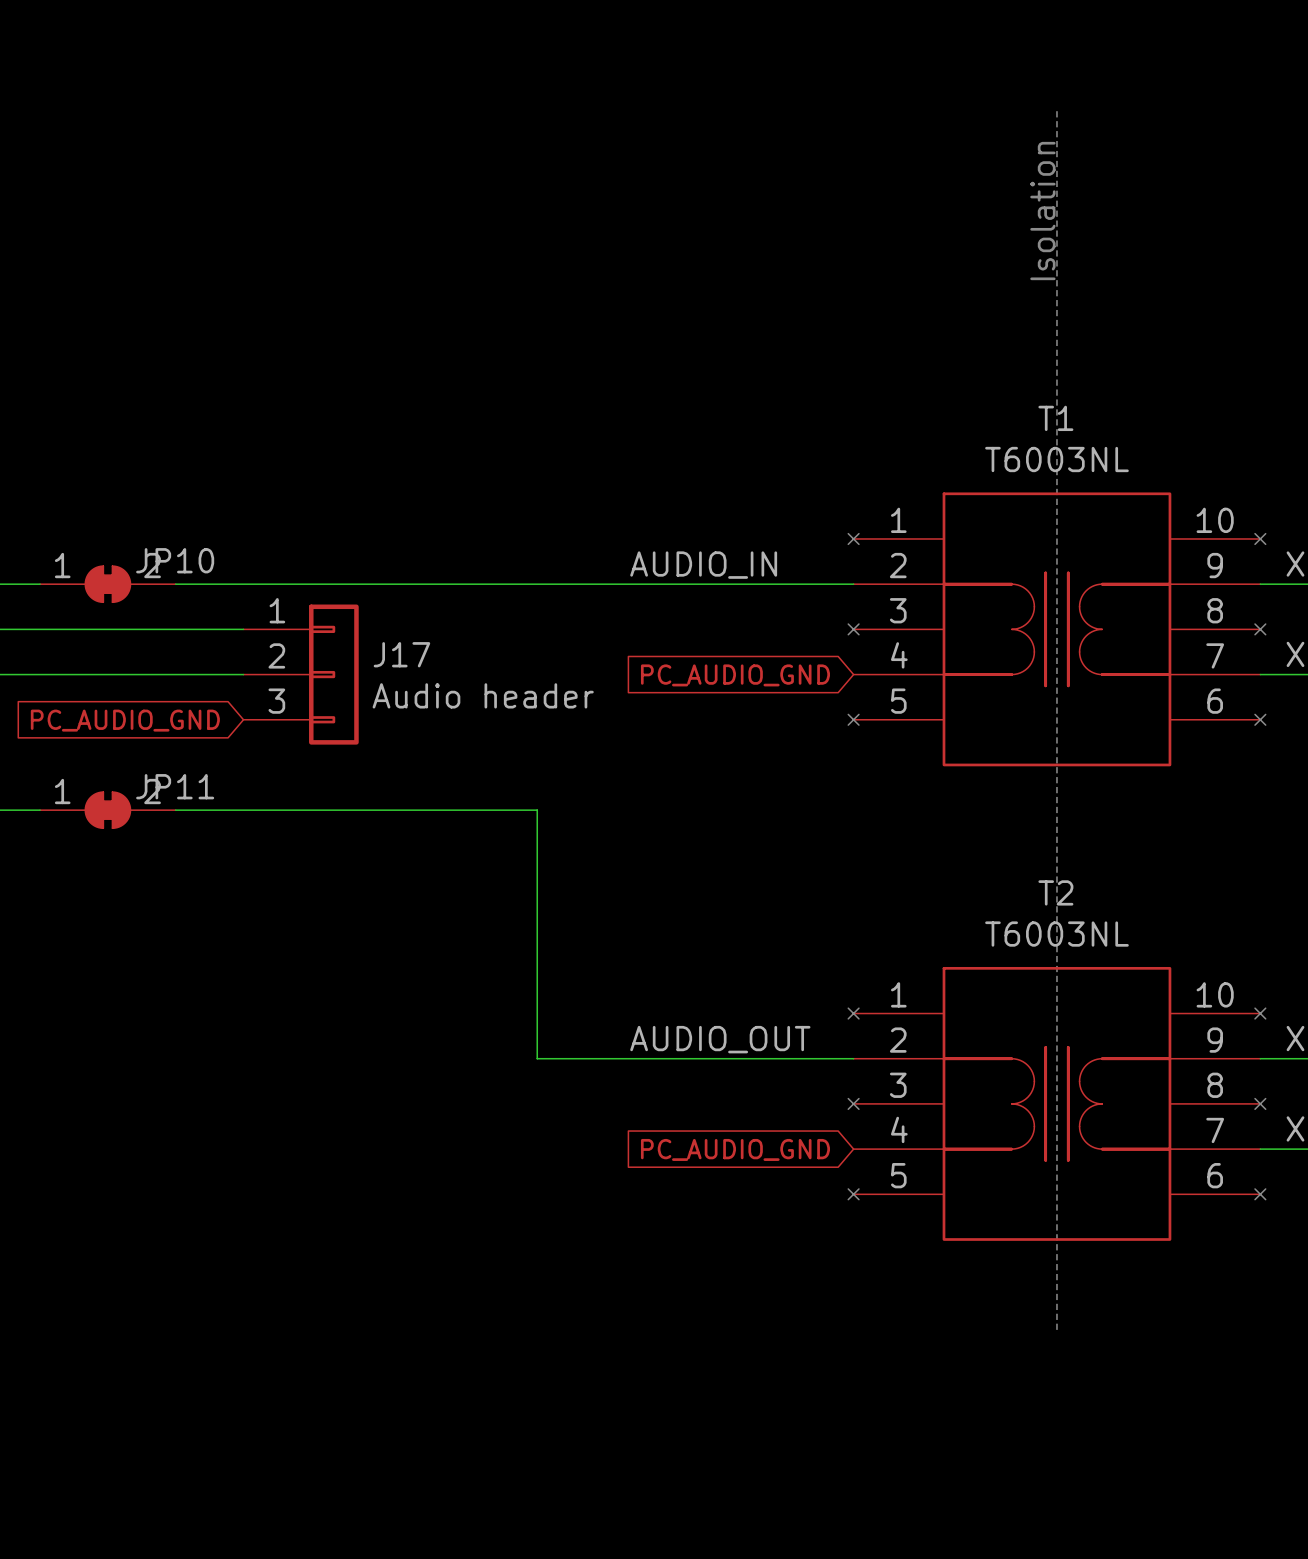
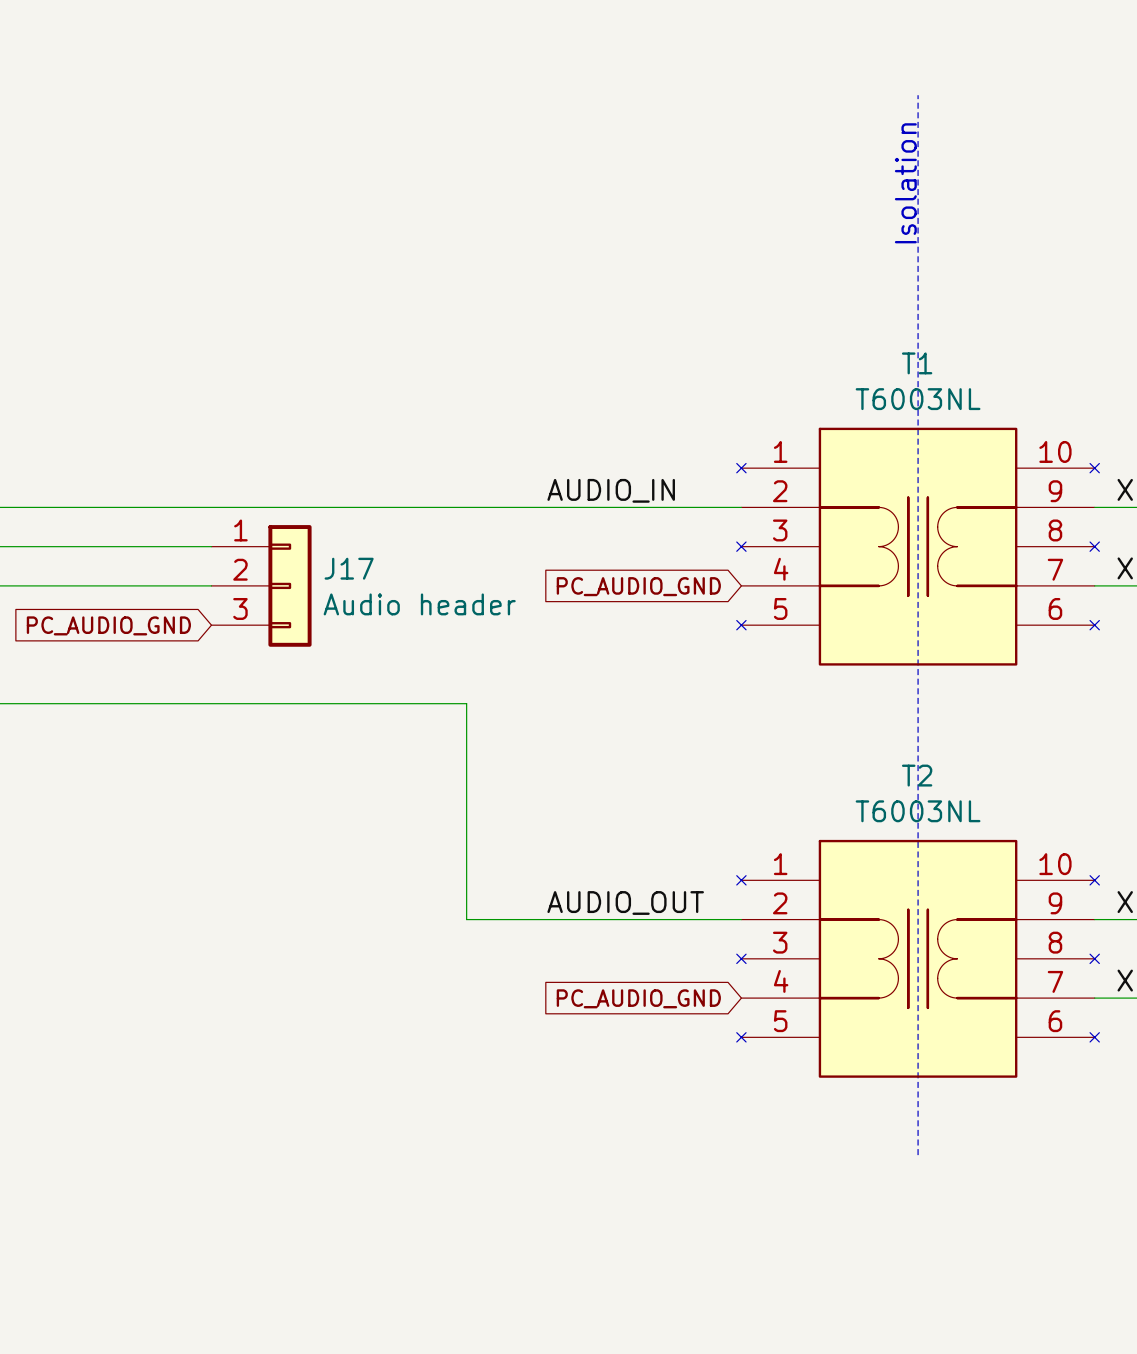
JP10: (107, 584) -> none
JP11: (107, 810) -> none

